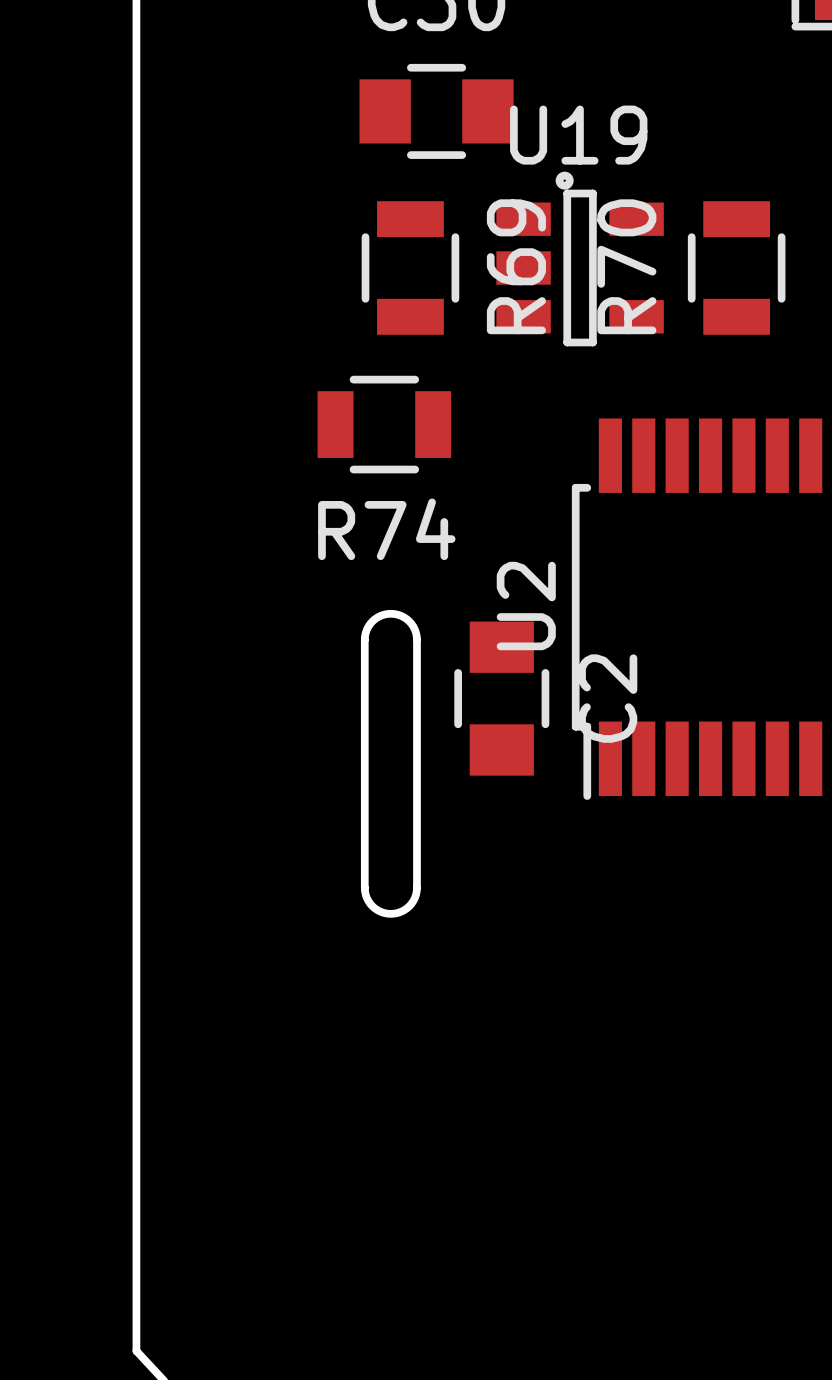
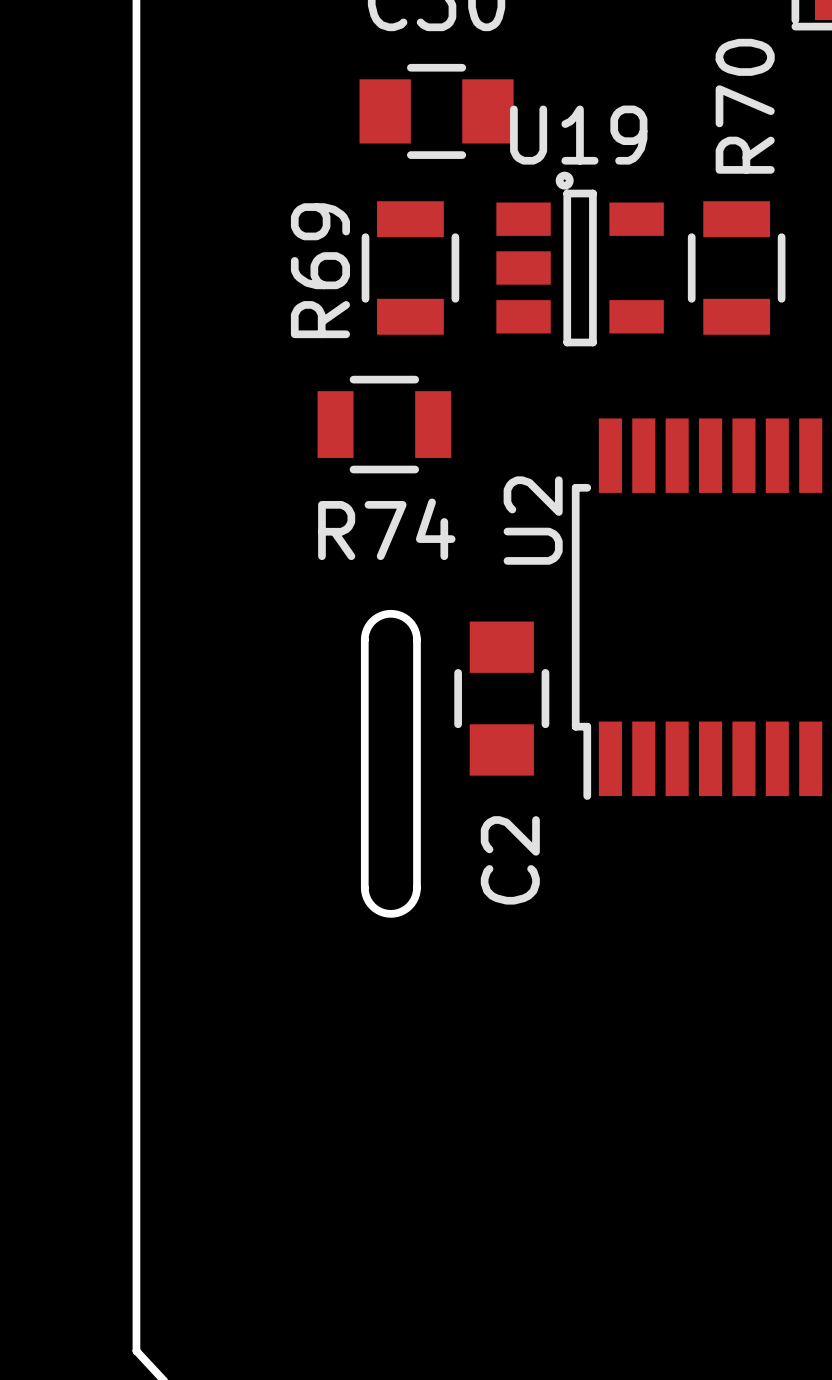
R69 name position: R69 (516, 266) -> R69 (320, 270)
R70 name position: R70 (626, 266) -> R70 (745, 106)
U2 name position: U2 (526, 606) -> U2 (533, 520)
C2 name position: C2 (607, 698) -> C2 (510, 860)

